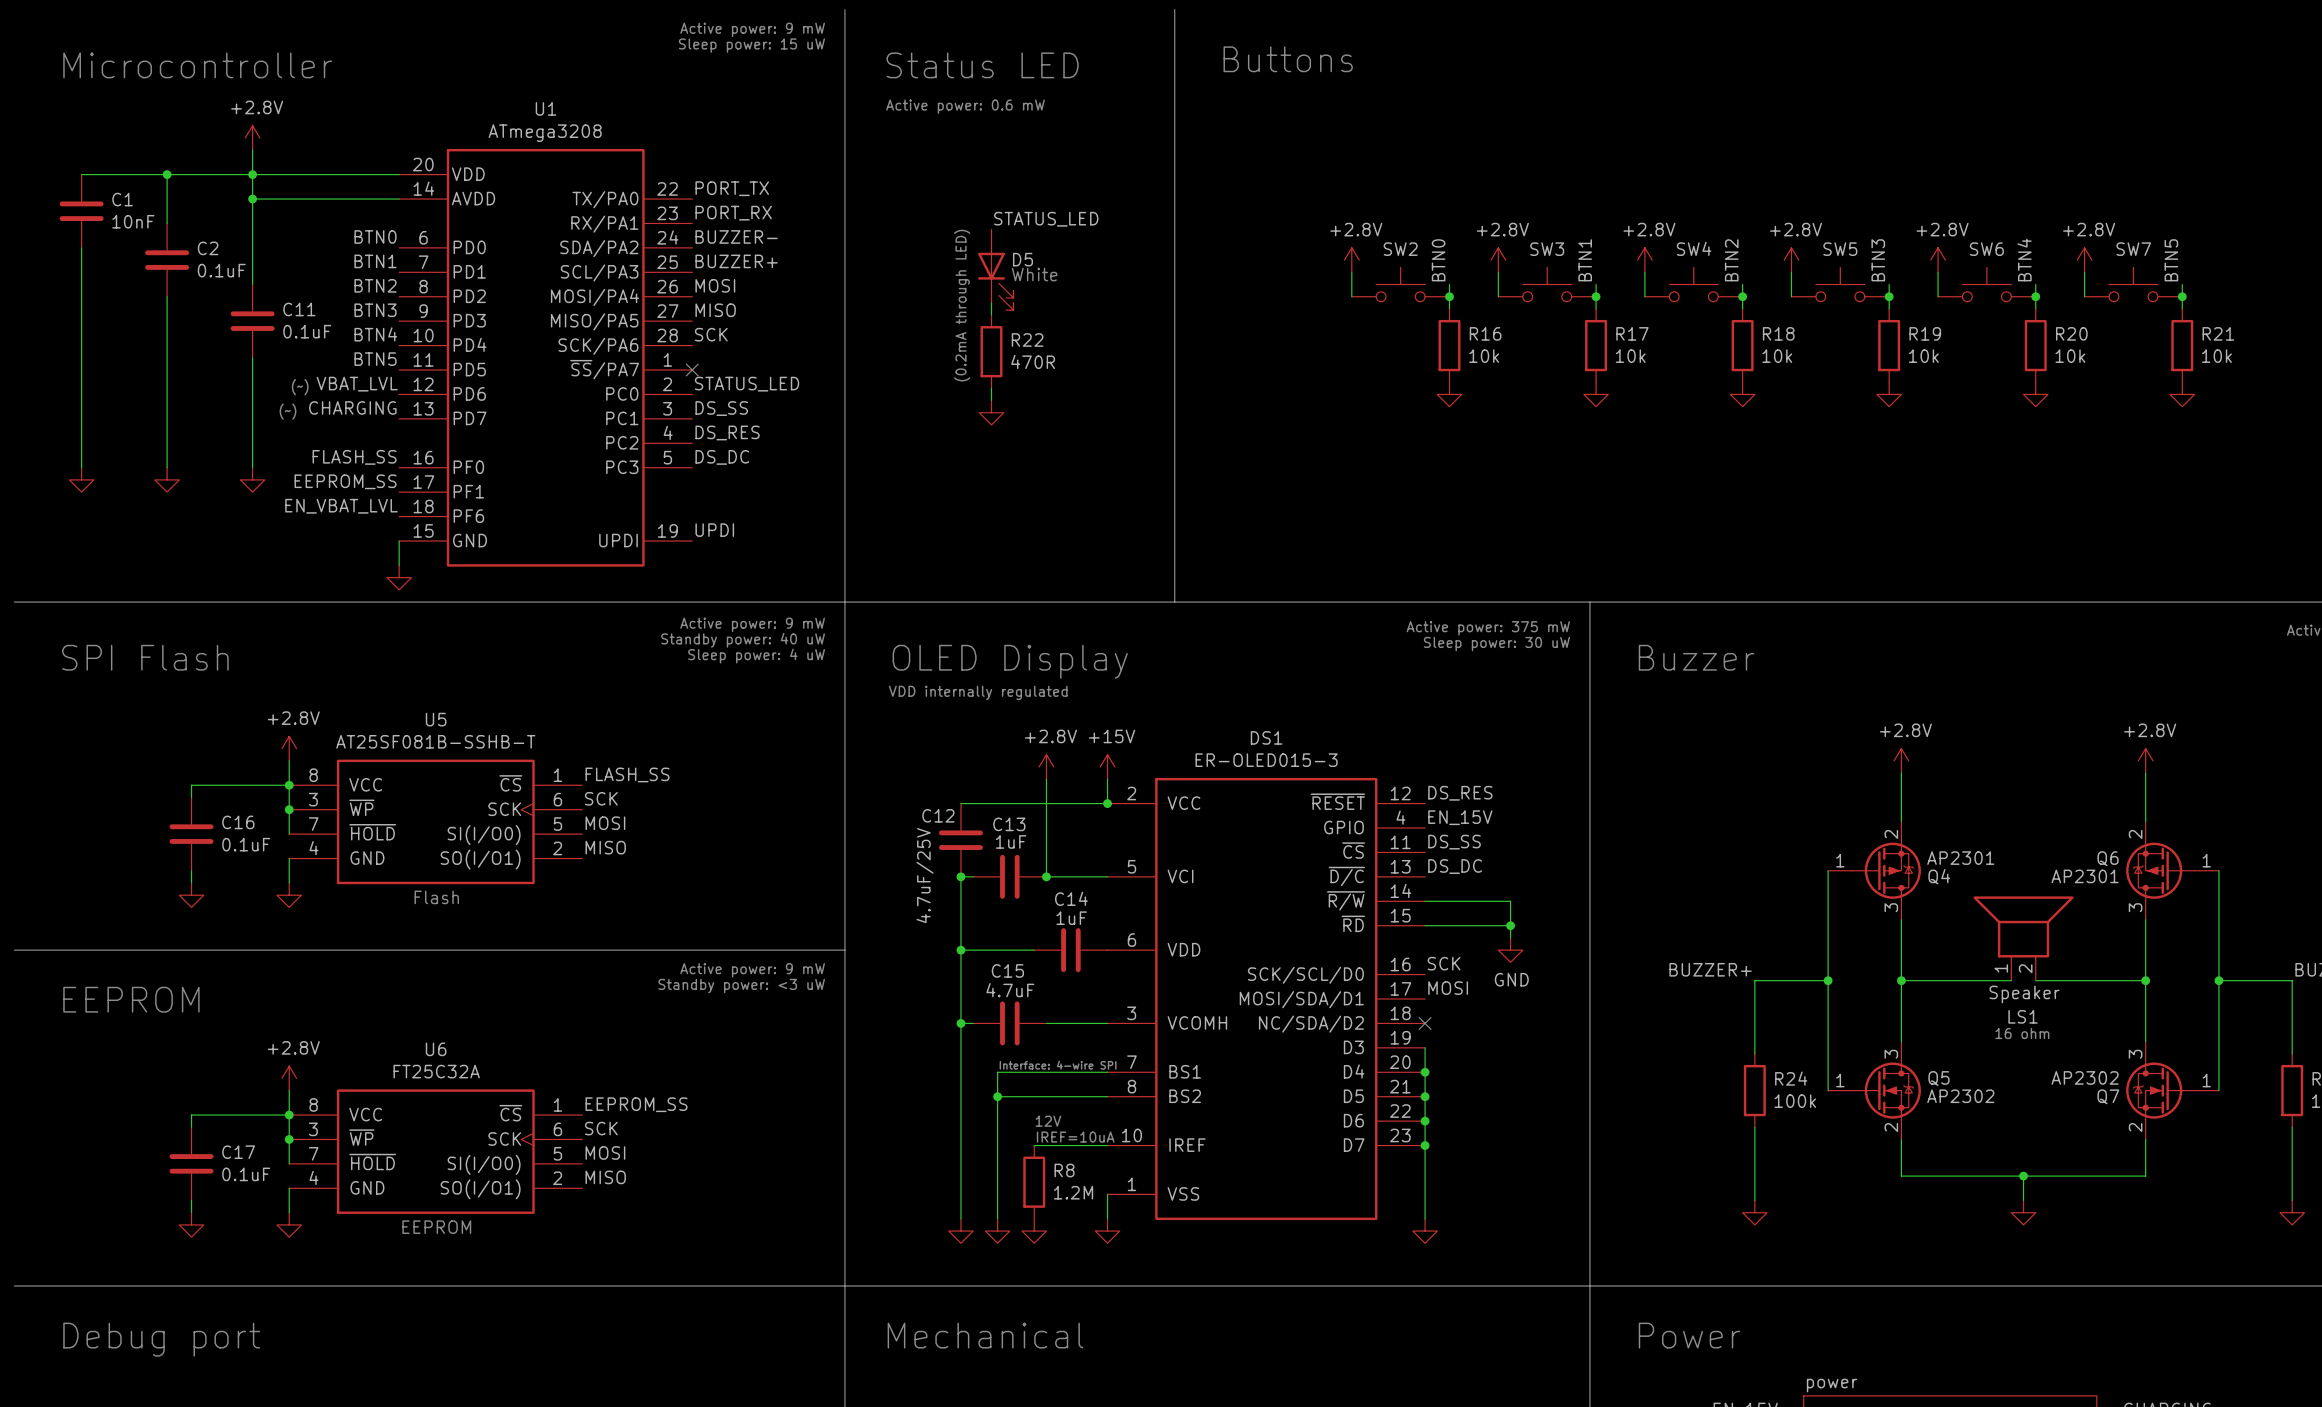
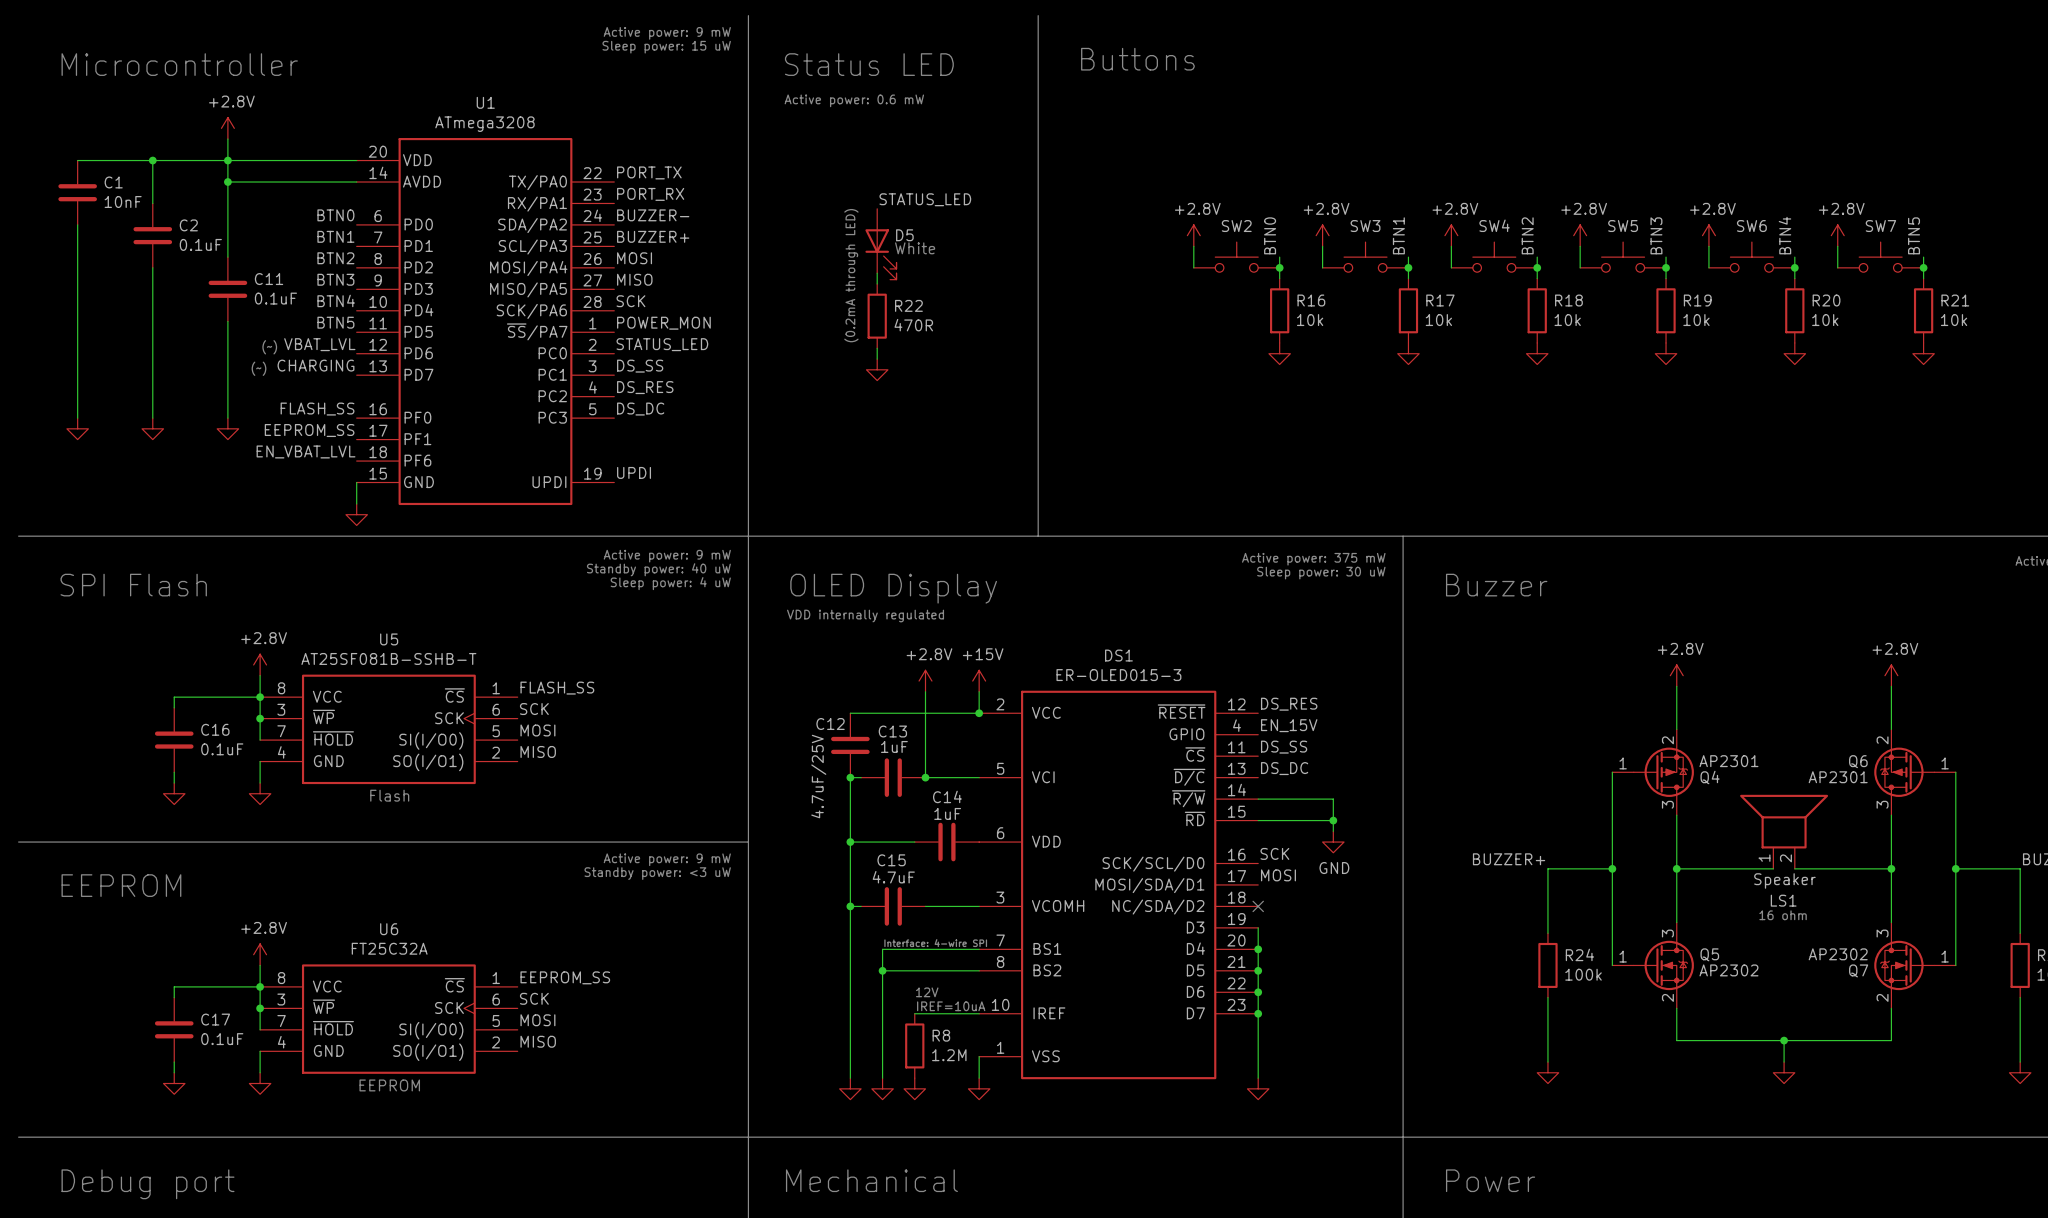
label: none -> POWER_MON (663, 323)
no-connect mark: (692, 370) -> none

